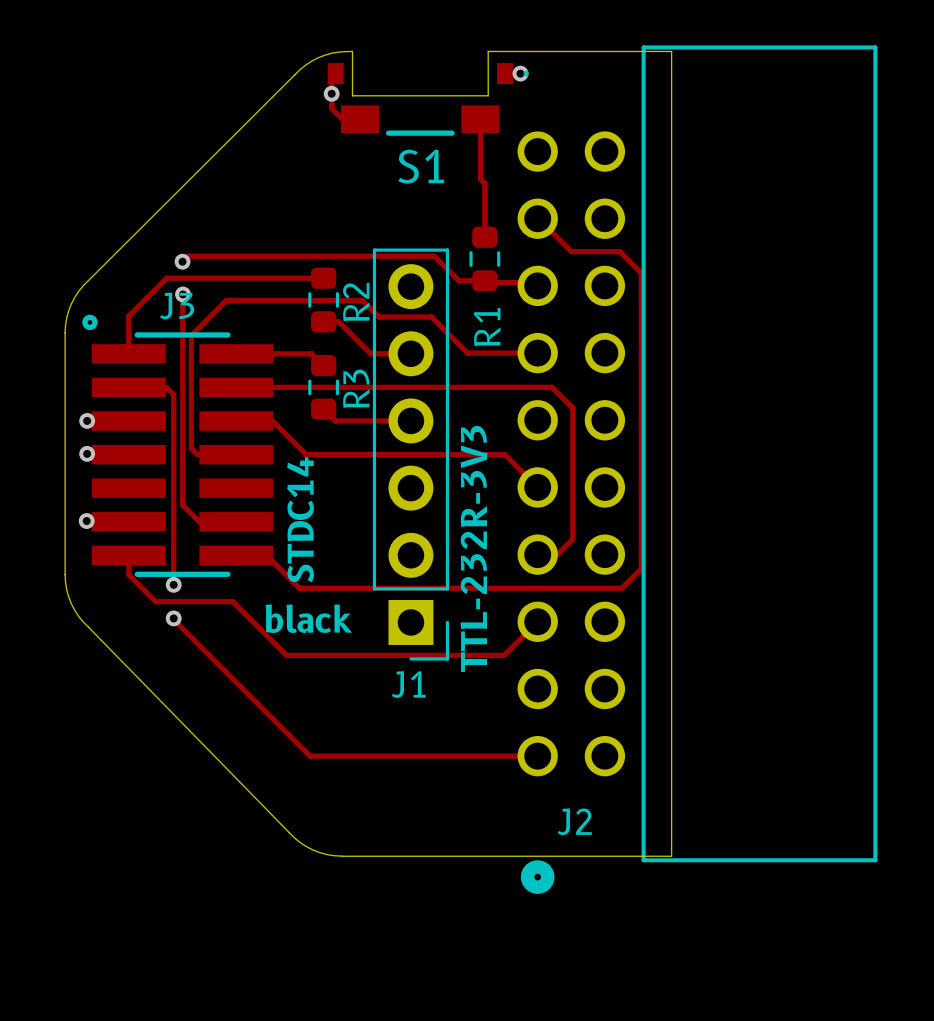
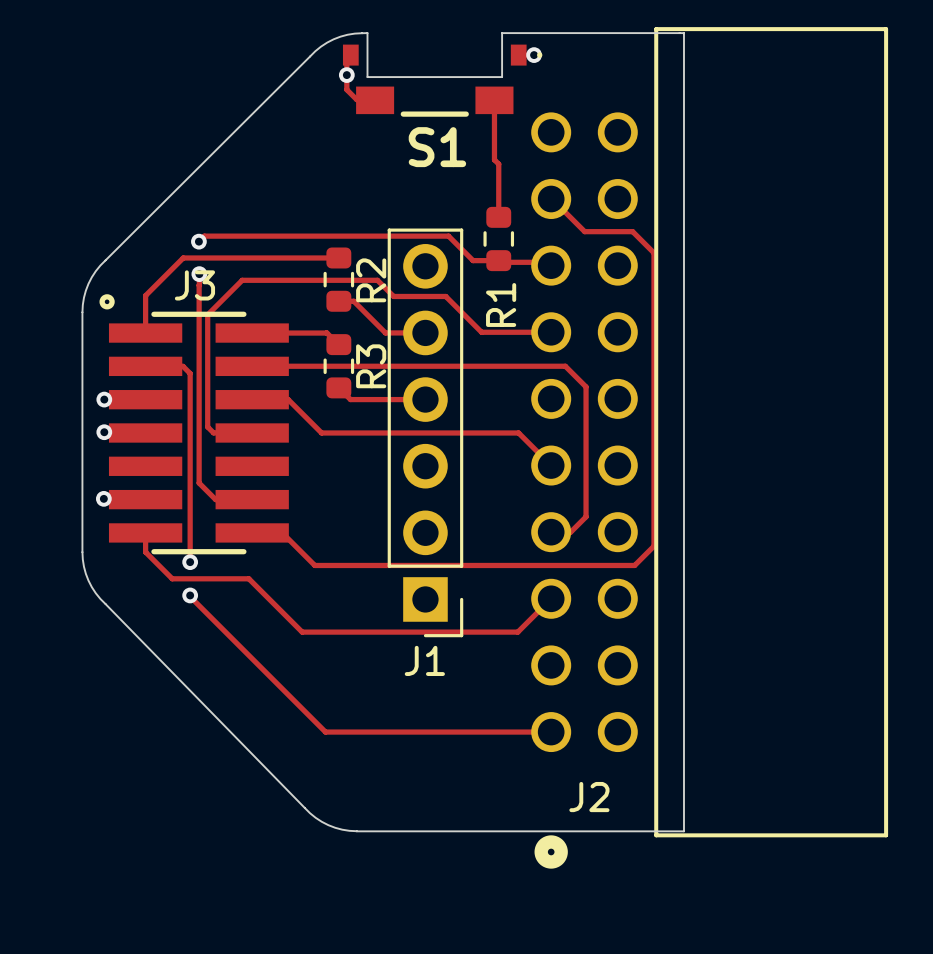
text: STDC14 (300, 519) -> none
text: TTL-232R-3V3 (473, 548) -> none
text: black (308, 618) -> none

